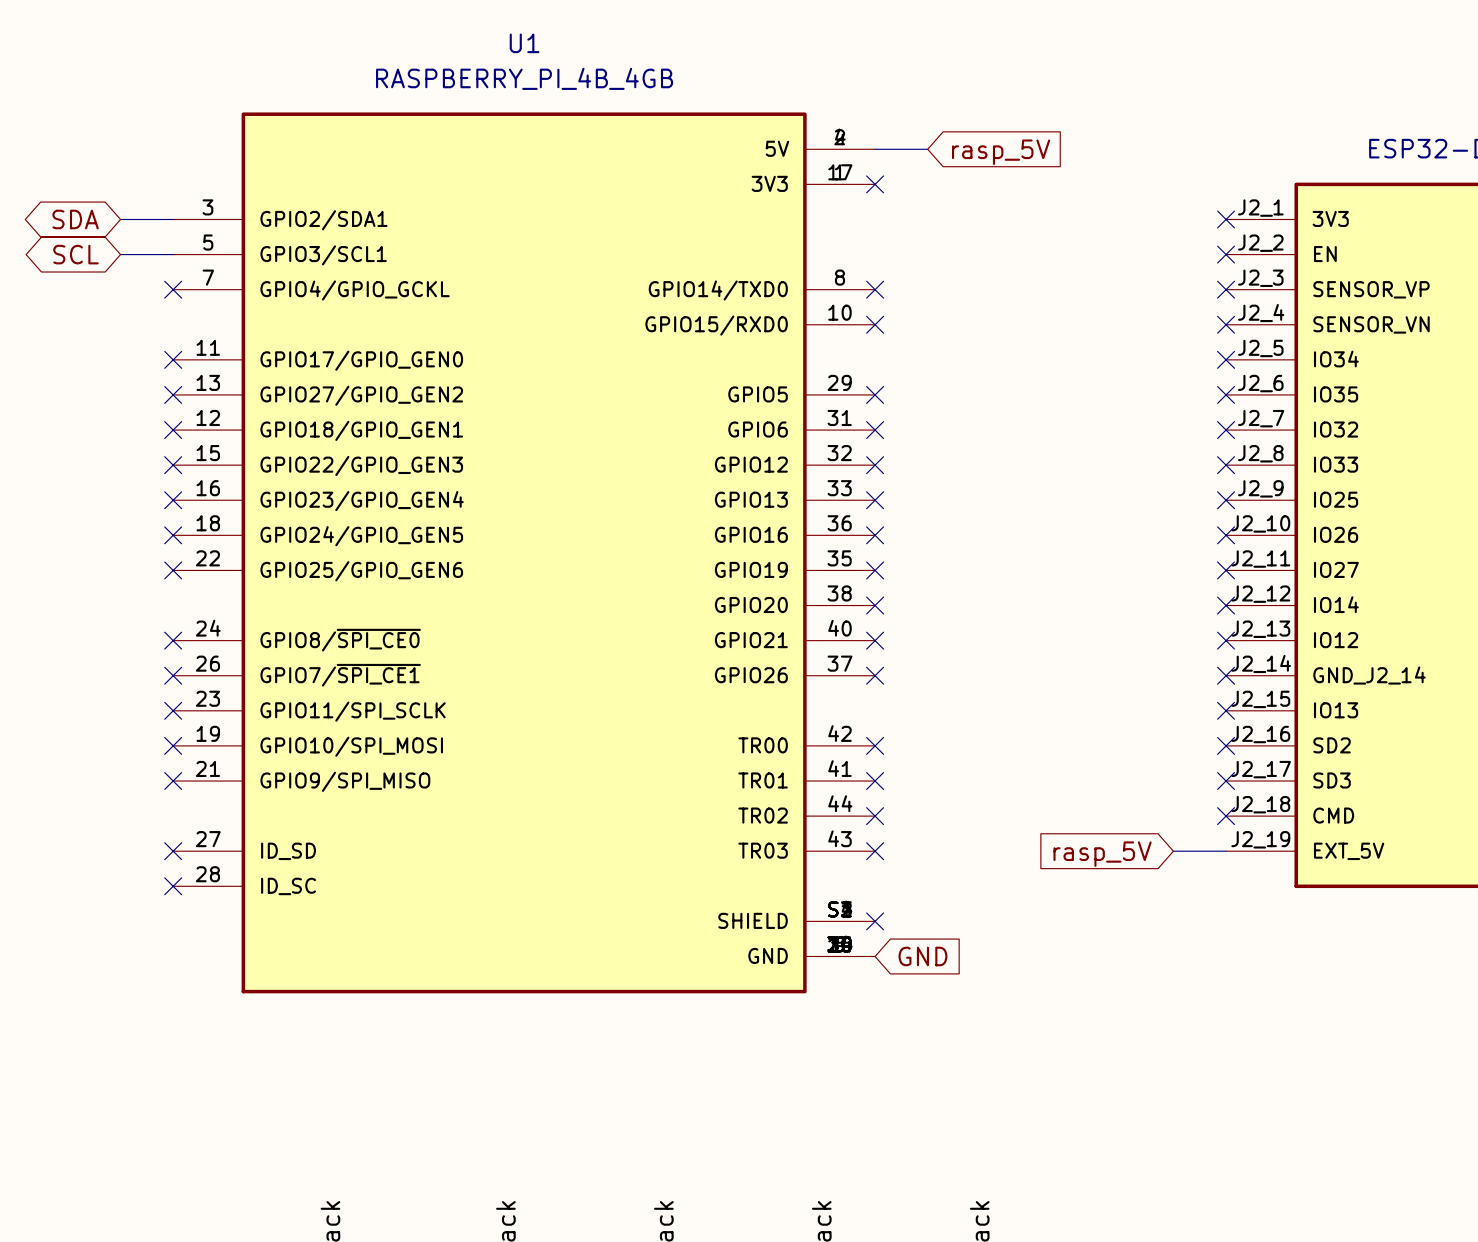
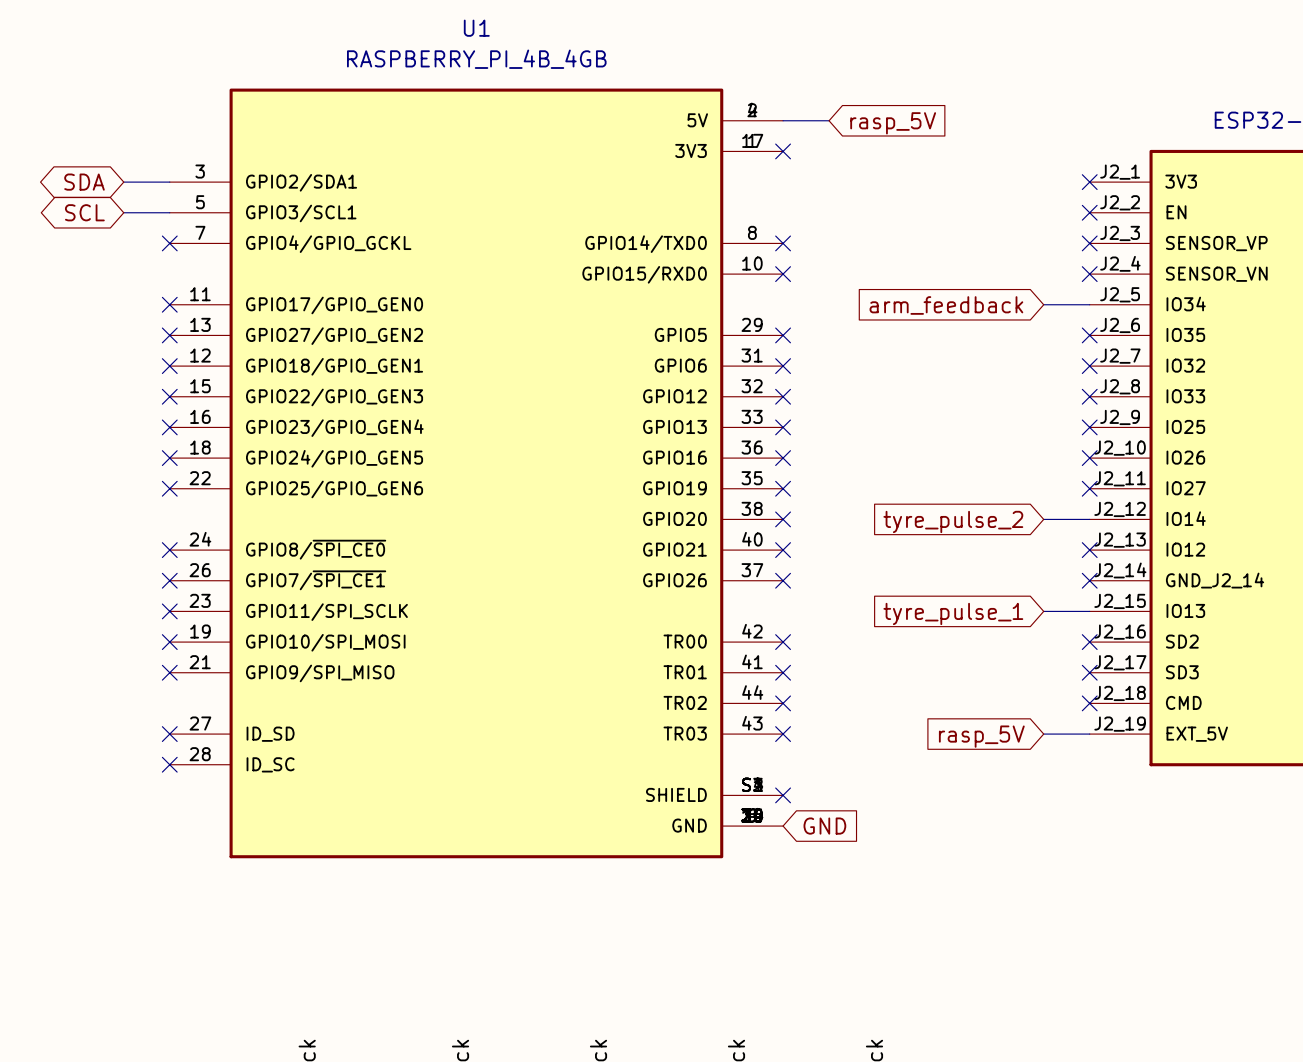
wire: none -> (1043, 304) (1089, 304)
no-connect mark: (1226, 359) -> none
global label: none -> arm_feedback (946, 305)
wire: none -> (1043, 519) (1089, 519)
no-connect mark: (1226, 605) -> none
global label: none -> tyre_pulse_2 (953, 521)
wire: none -> (1043, 611) (1089, 611)
no-connect mark: (1226, 710) -> none
global label: none -> tyre_pulse_1 (953, 613)

